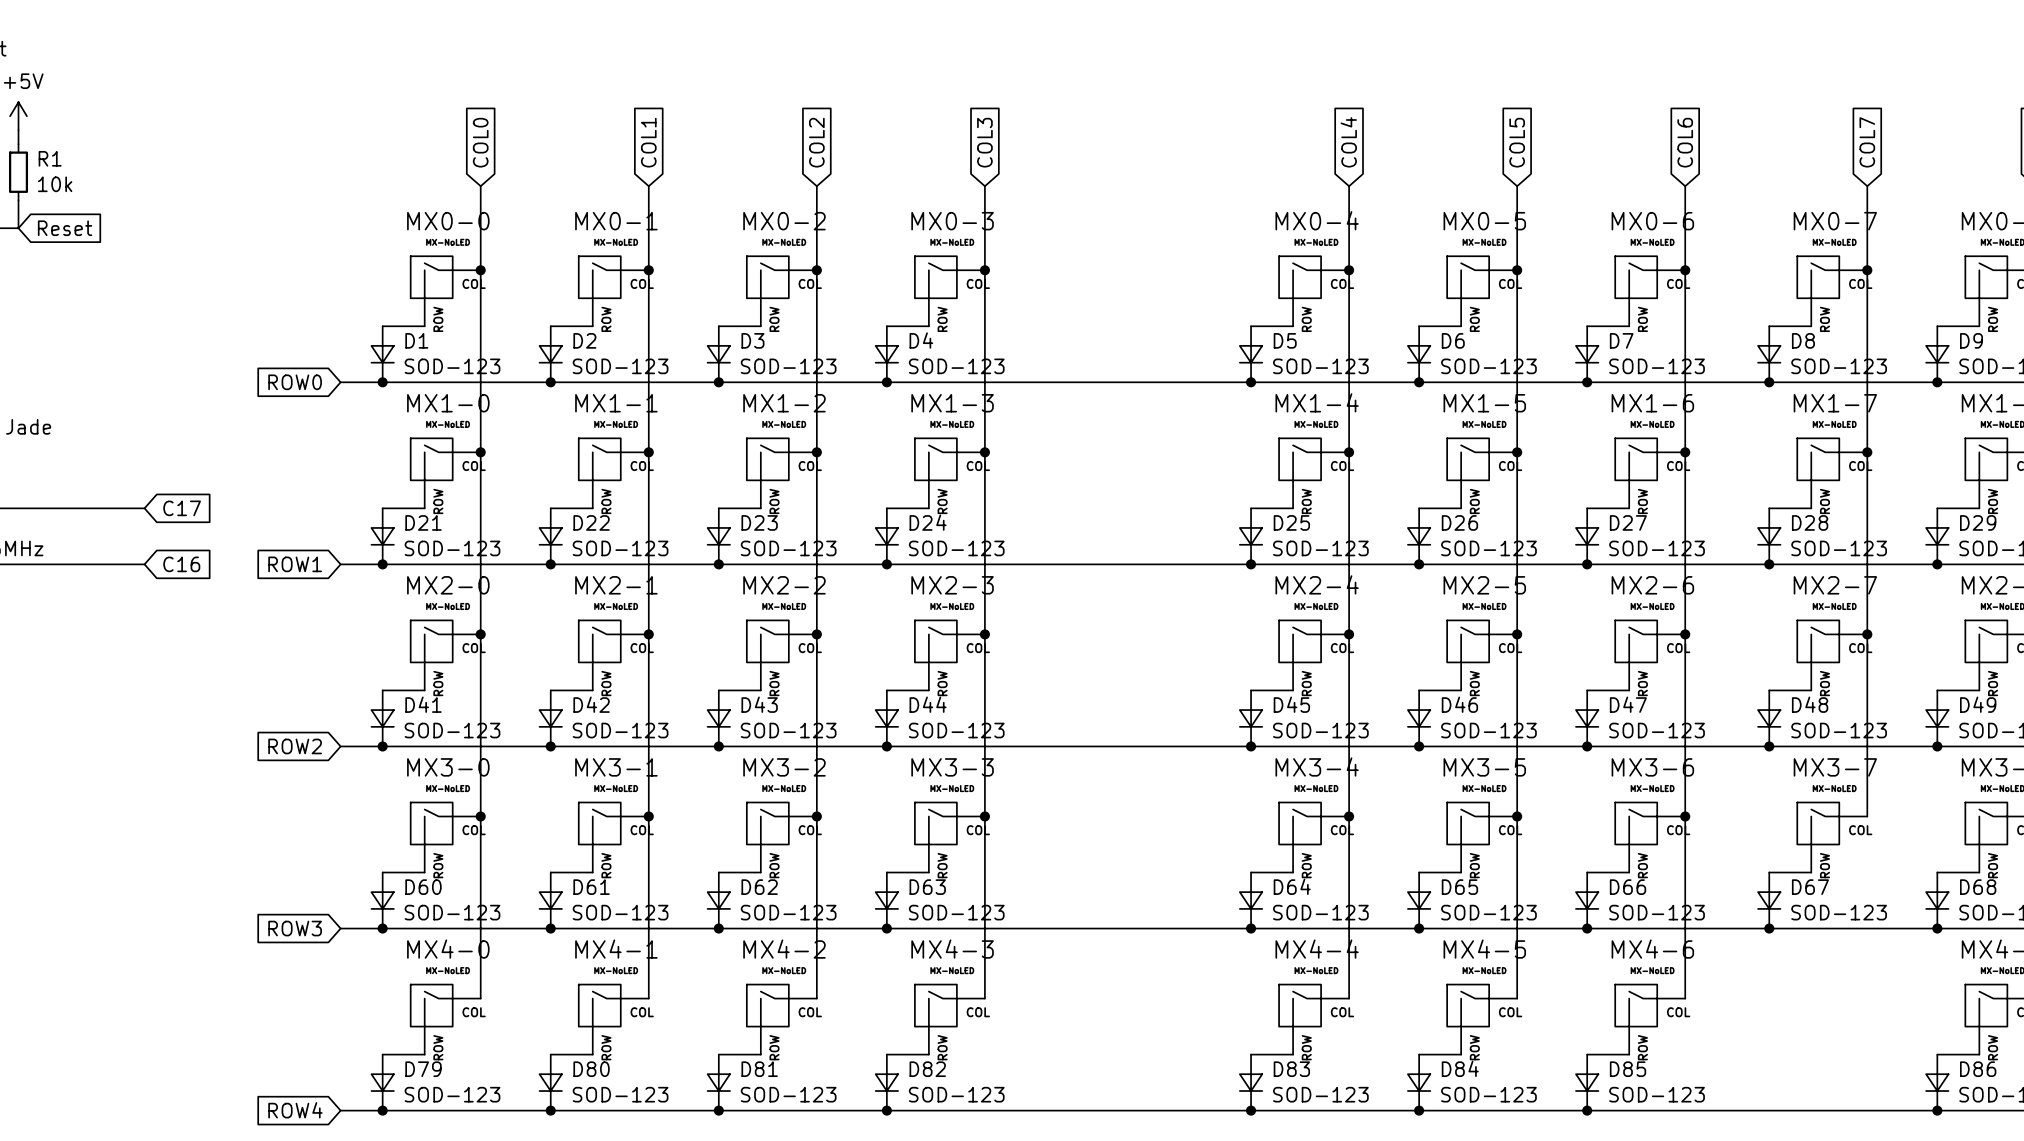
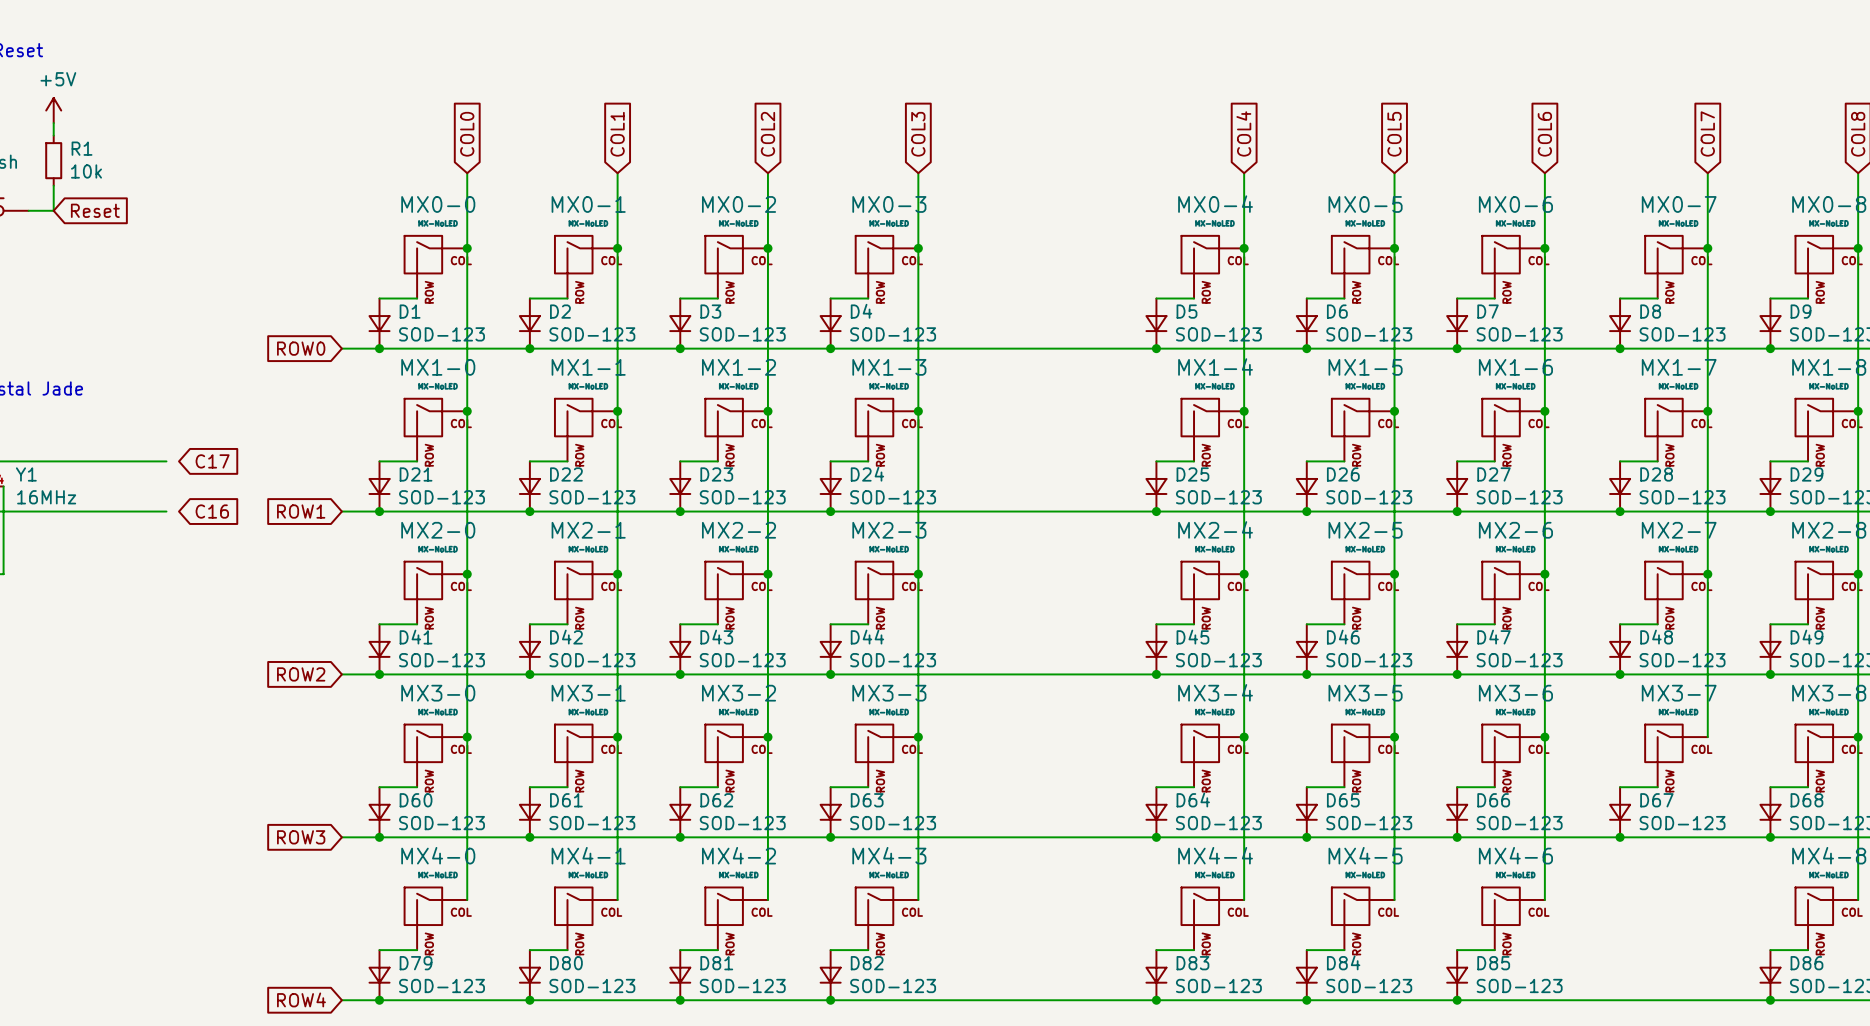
global label position: C17 (182, 508) -> C17 (212, 461)
global label position: C16 (181, 564) -> C16 (212, 511)

